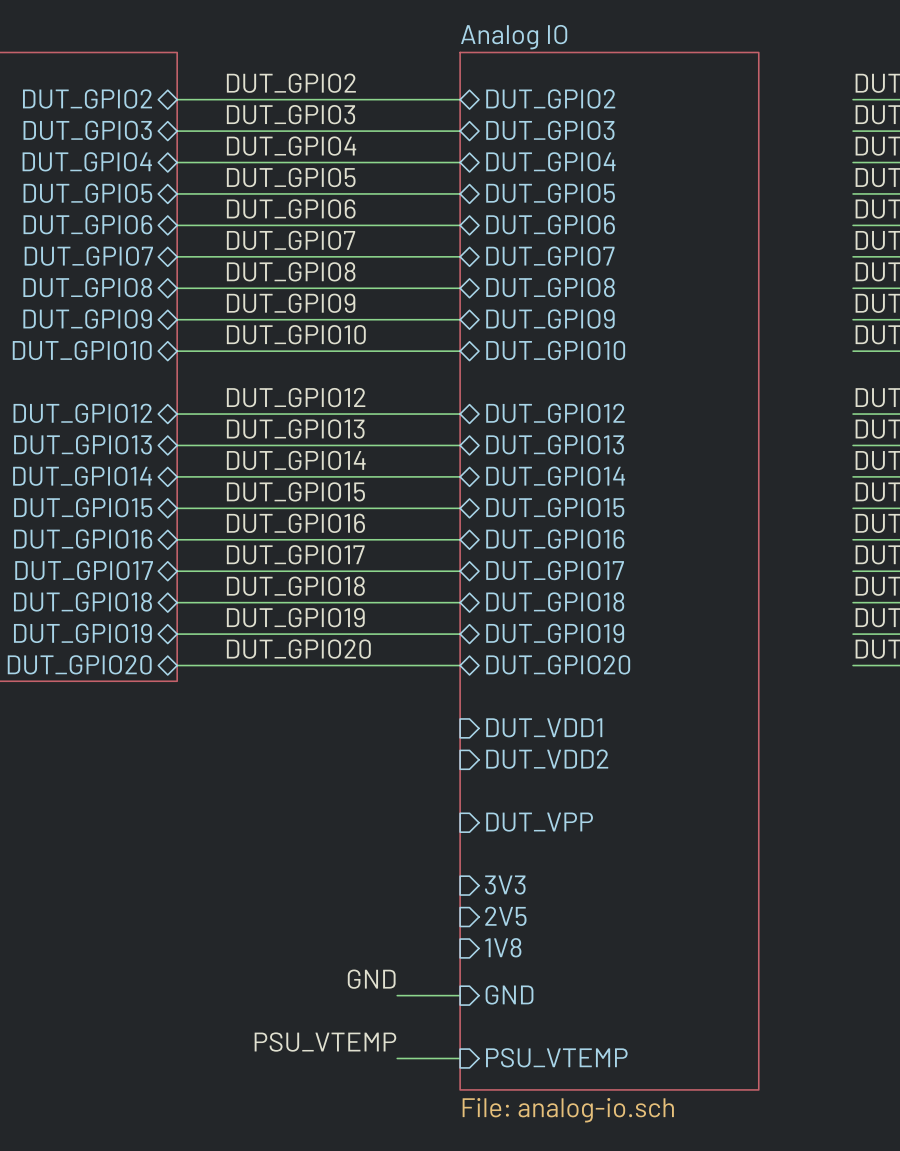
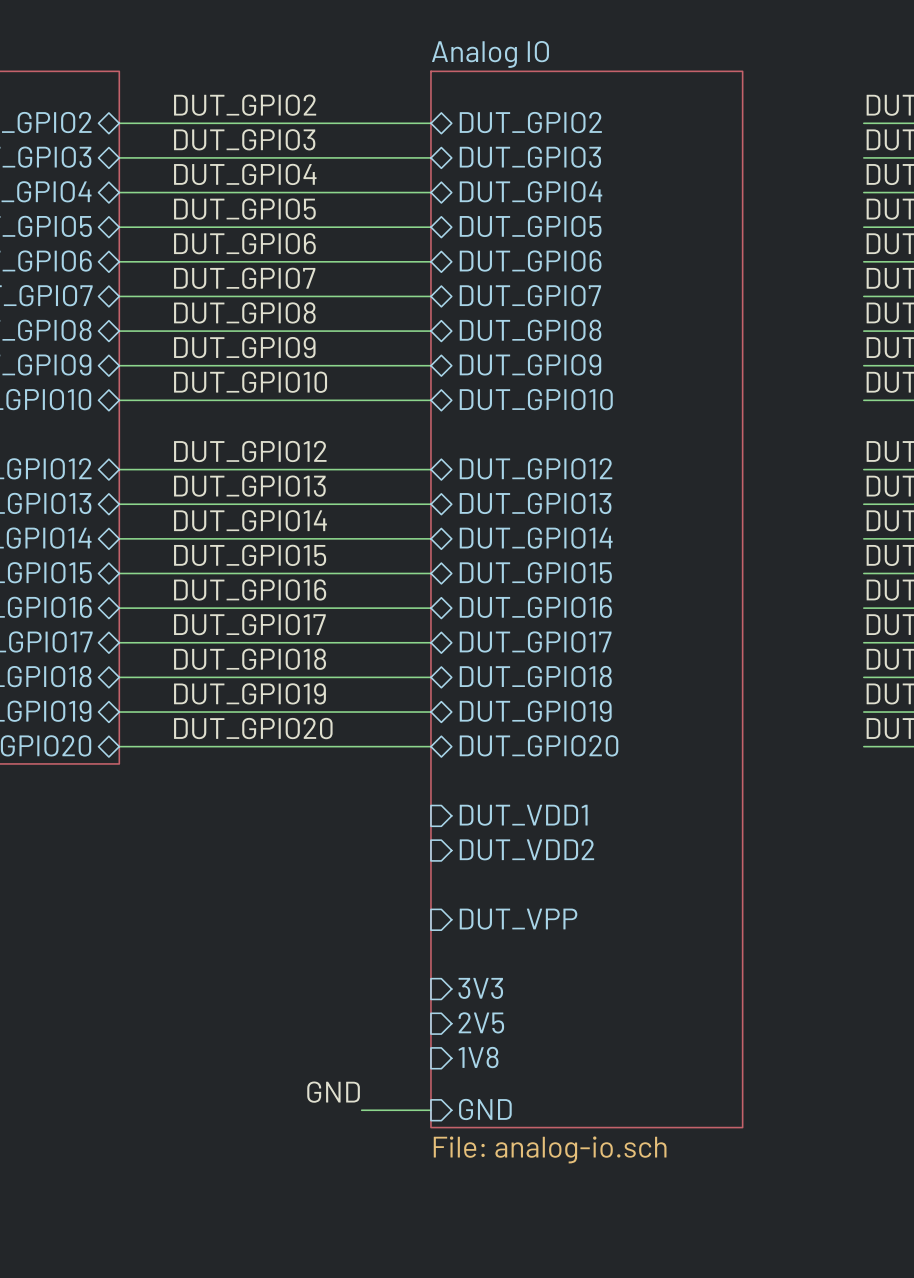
sheet Analog IO: none -> File: analog-io.sch (586, 599)
sheet Analog IO: File: analog-io.sch (609, 571) -> none
label: PSU_VTEMP (325, 1042) -> none
sheet pin: PSU_VTEMP (556, 1057) -> none
wire: (397, 1058) (460, 1058) -> none

